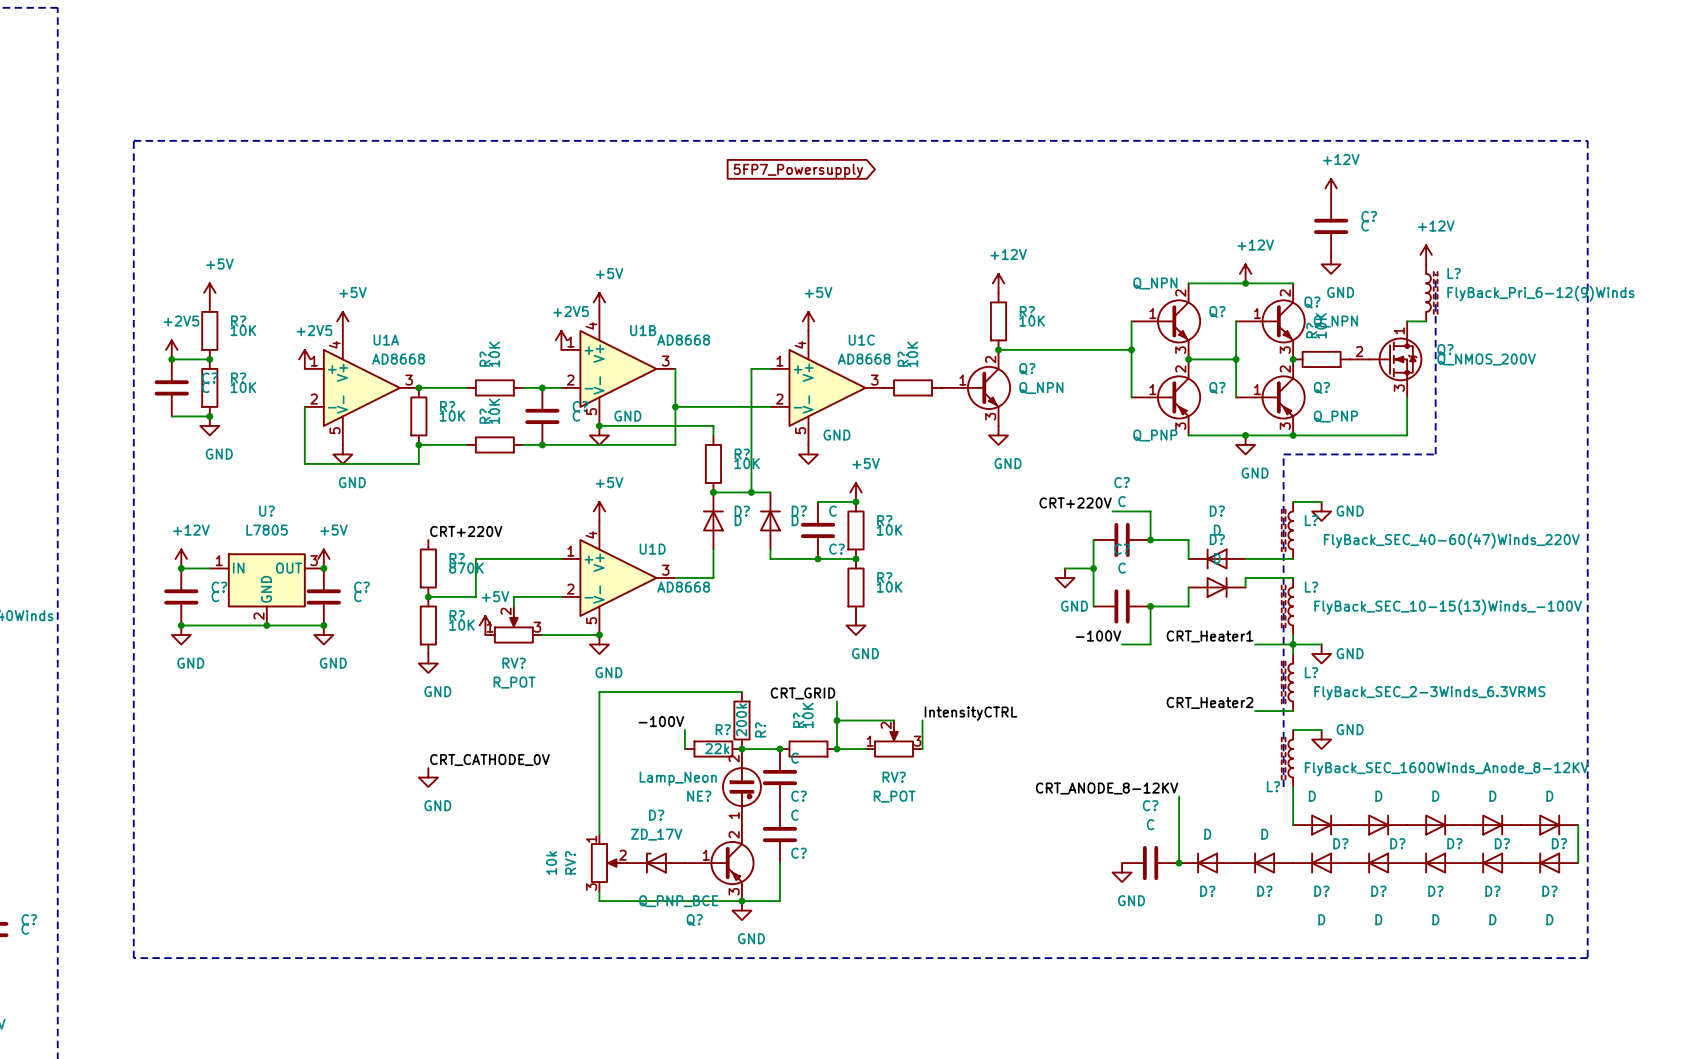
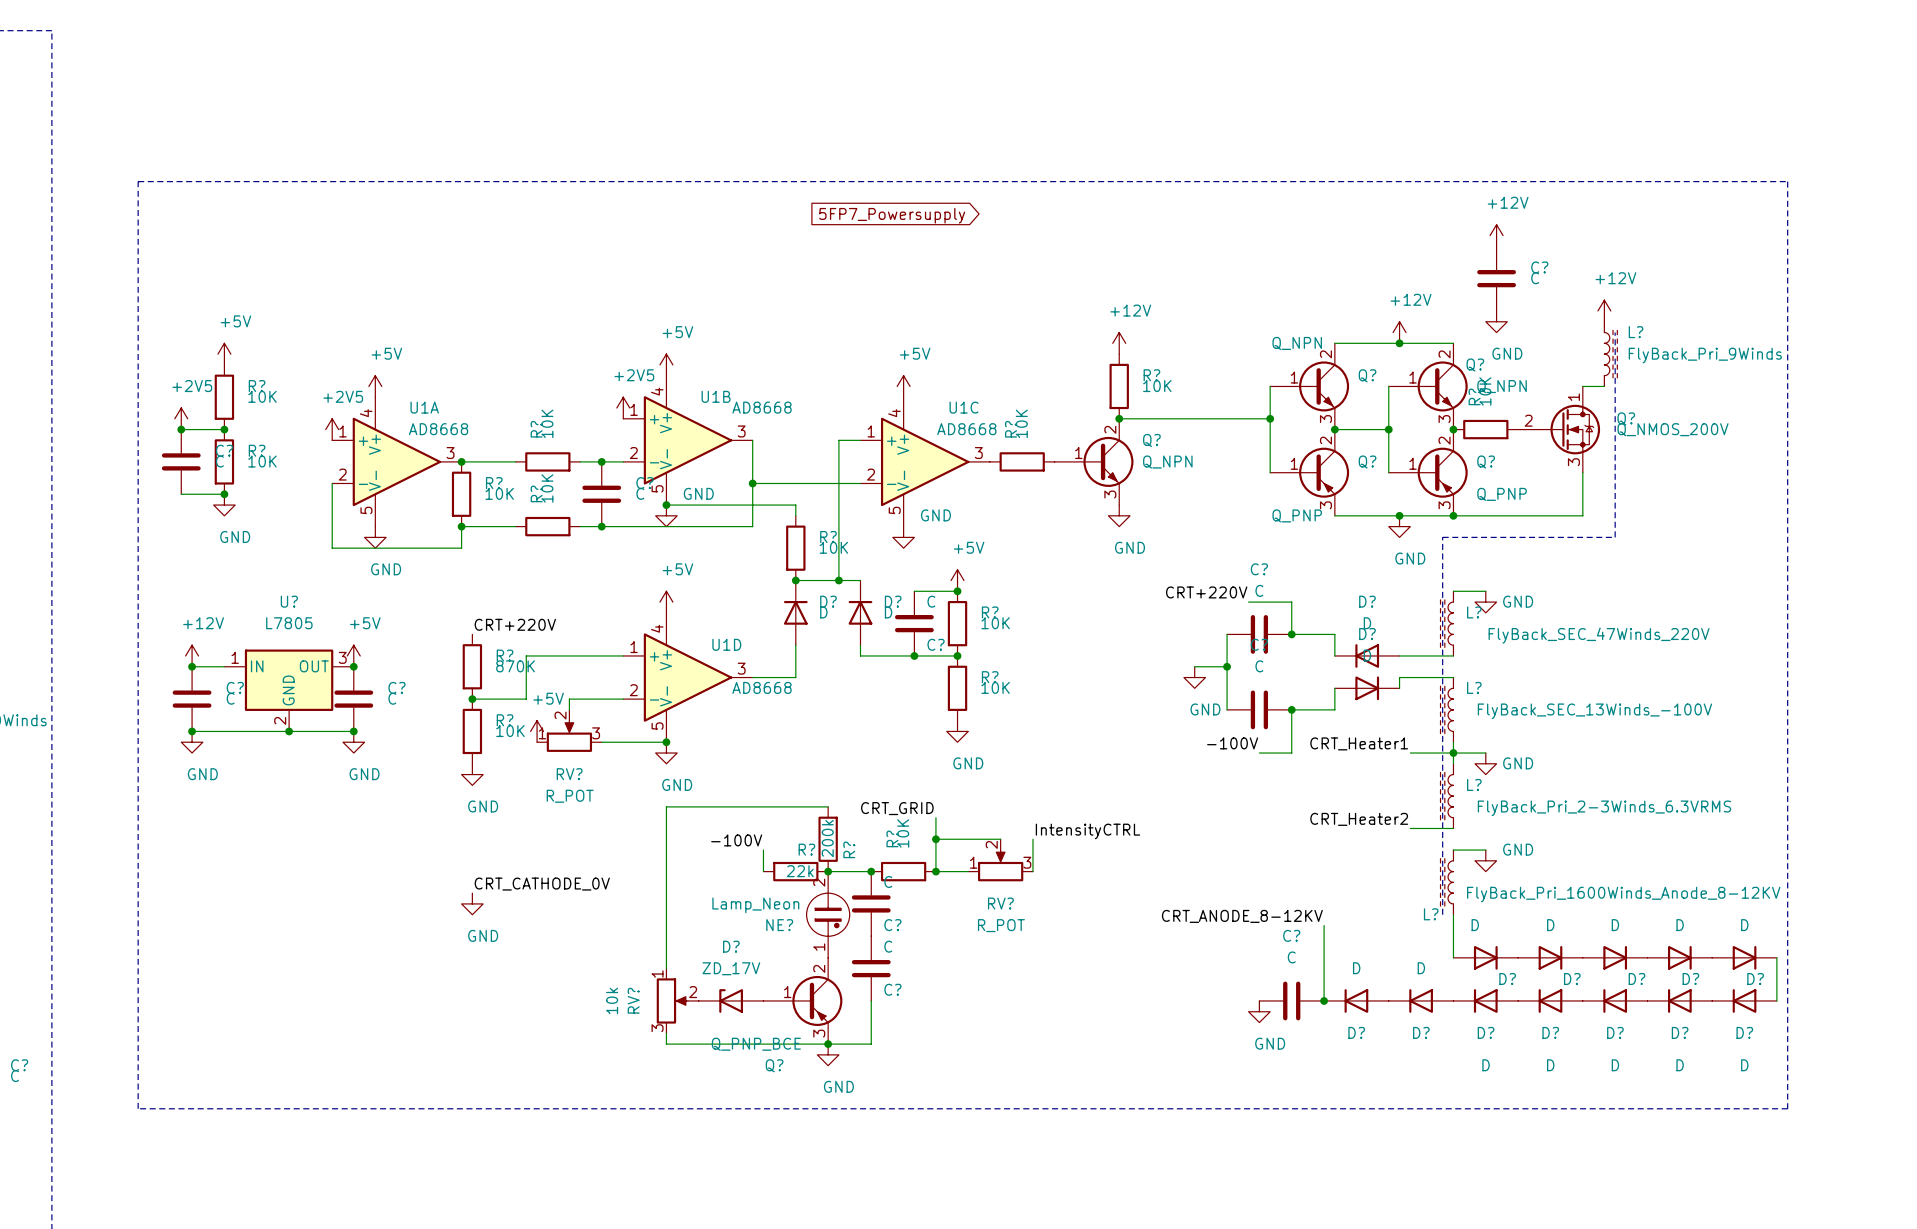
L? value: FlyBack_Pri_6-12(9)Winds (1540, 293) -> FlyBack_Pri_9Winds (1705, 355)
L? value: FlyBack_SEC_40-60(47)Winds_220V (1451, 540) -> FlyBack_SEC_47Winds_220V (1599, 635)
L? value: FlyBack_SEC_10-15(13)Winds_-100V (1448, 607) -> FlyBack_SEC_13Winds_-100V (1594, 711)
L? value: FlyBack_SEC_2-3Winds_6.3VRMS (1429, 693) -> FlyBack_Pri_2-3Winds_6.3VRMS (1604, 808)
L? value: FlyBack_SEC_1600Winds_Anode_8-12KV (1446, 769) -> FlyBack_Pri_1600Winds_Anode_8-12KV (1623, 894)

